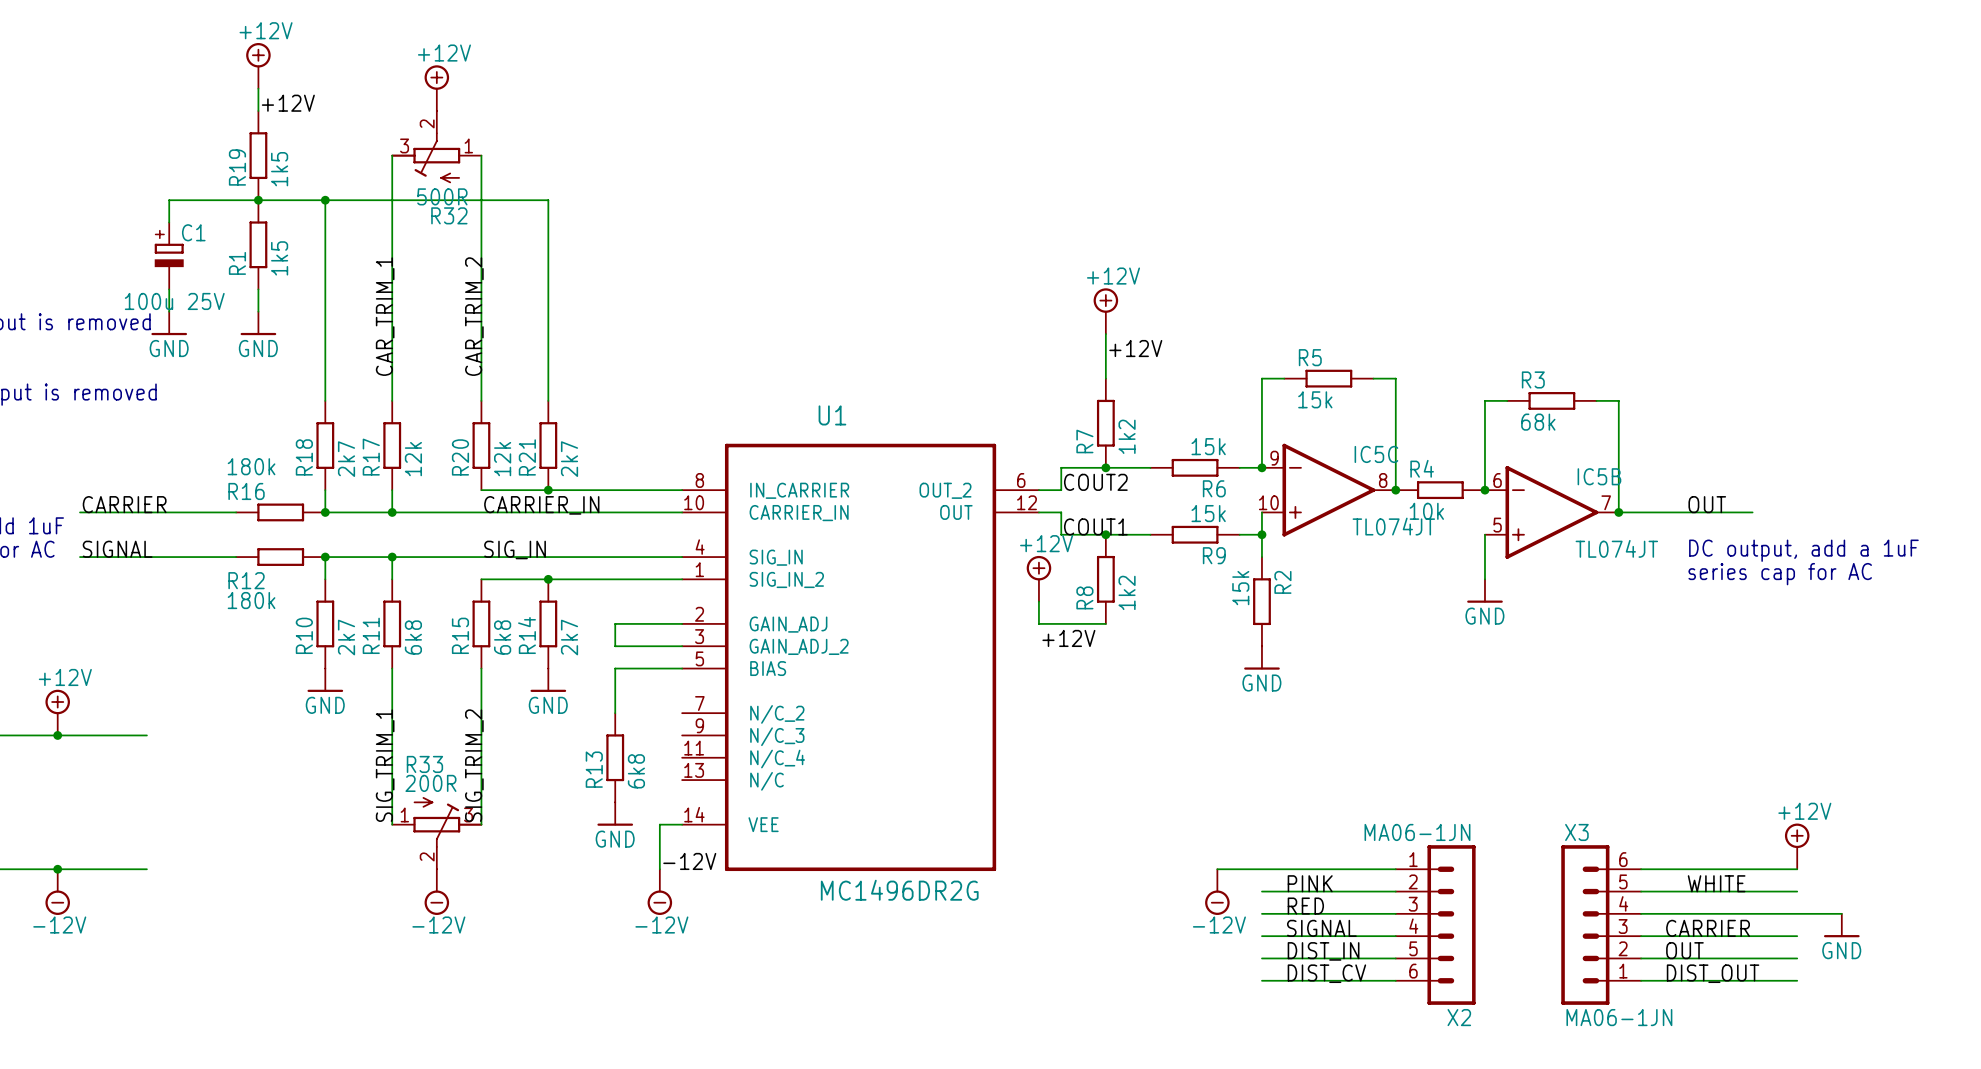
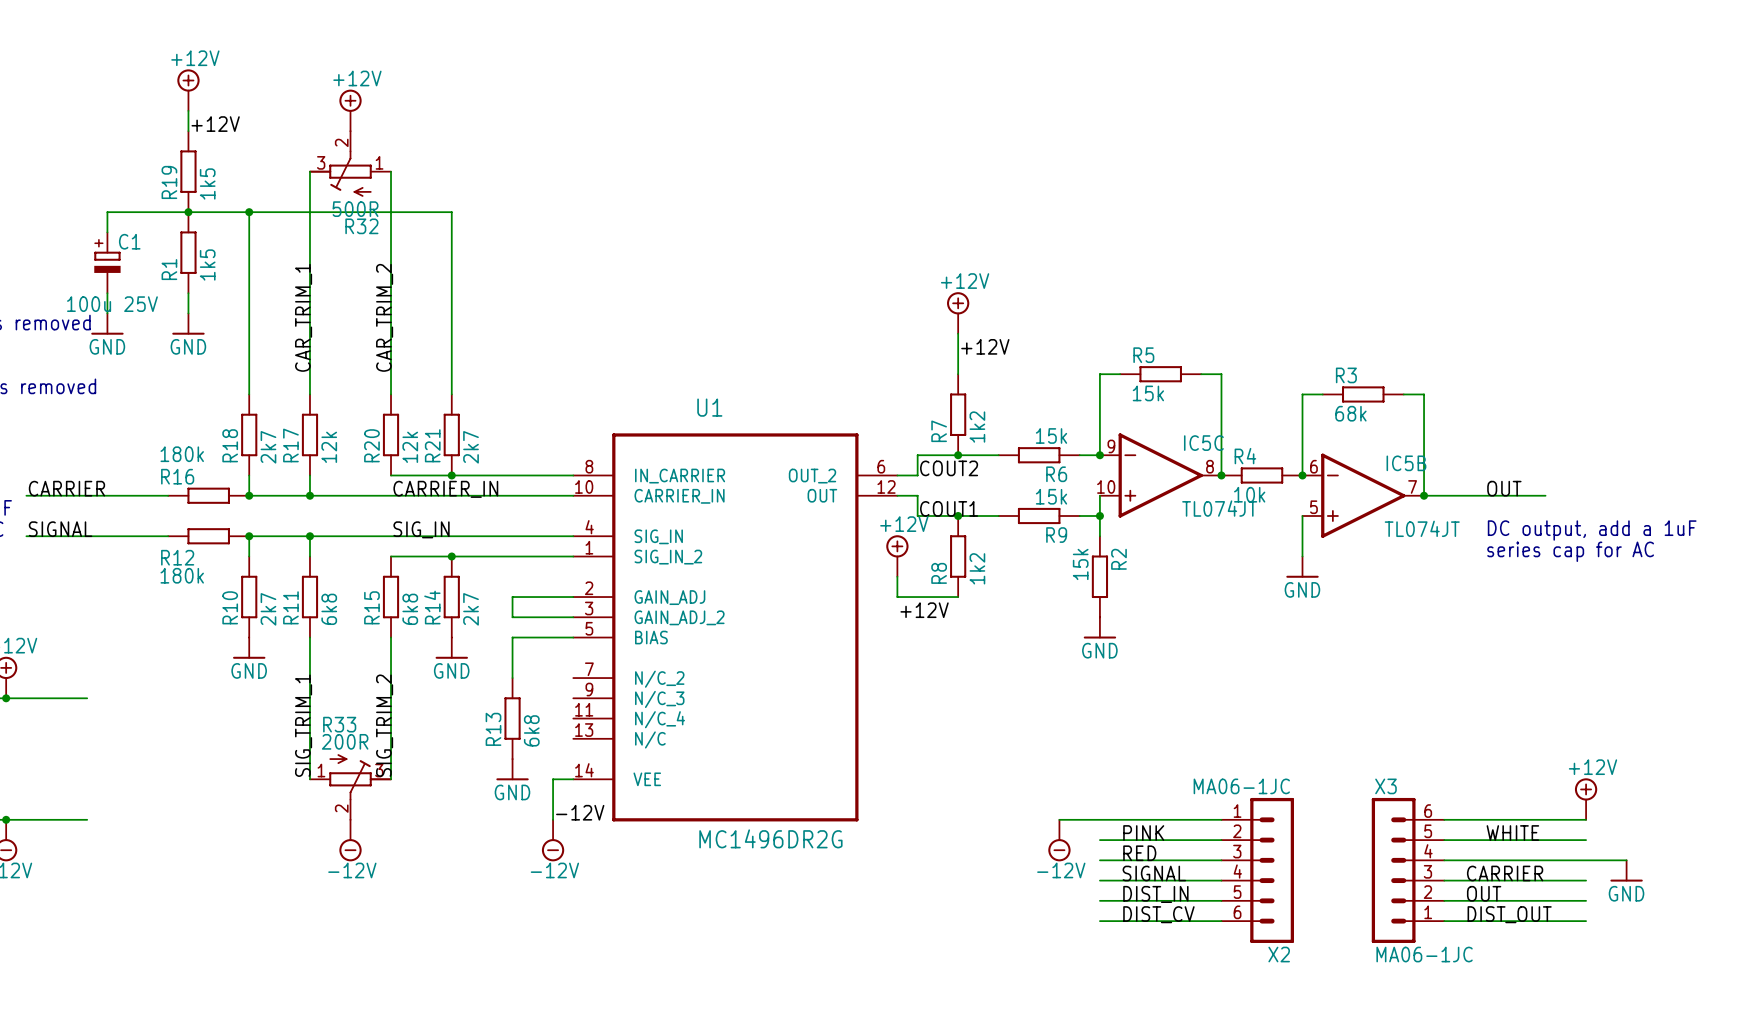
X2 value: MA06-1JN (1417, 832) -> MA06-1JC (1241, 786)
X3 value: MA06-1JN (1619, 1017) -> MA06-1JC (1424, 954)

